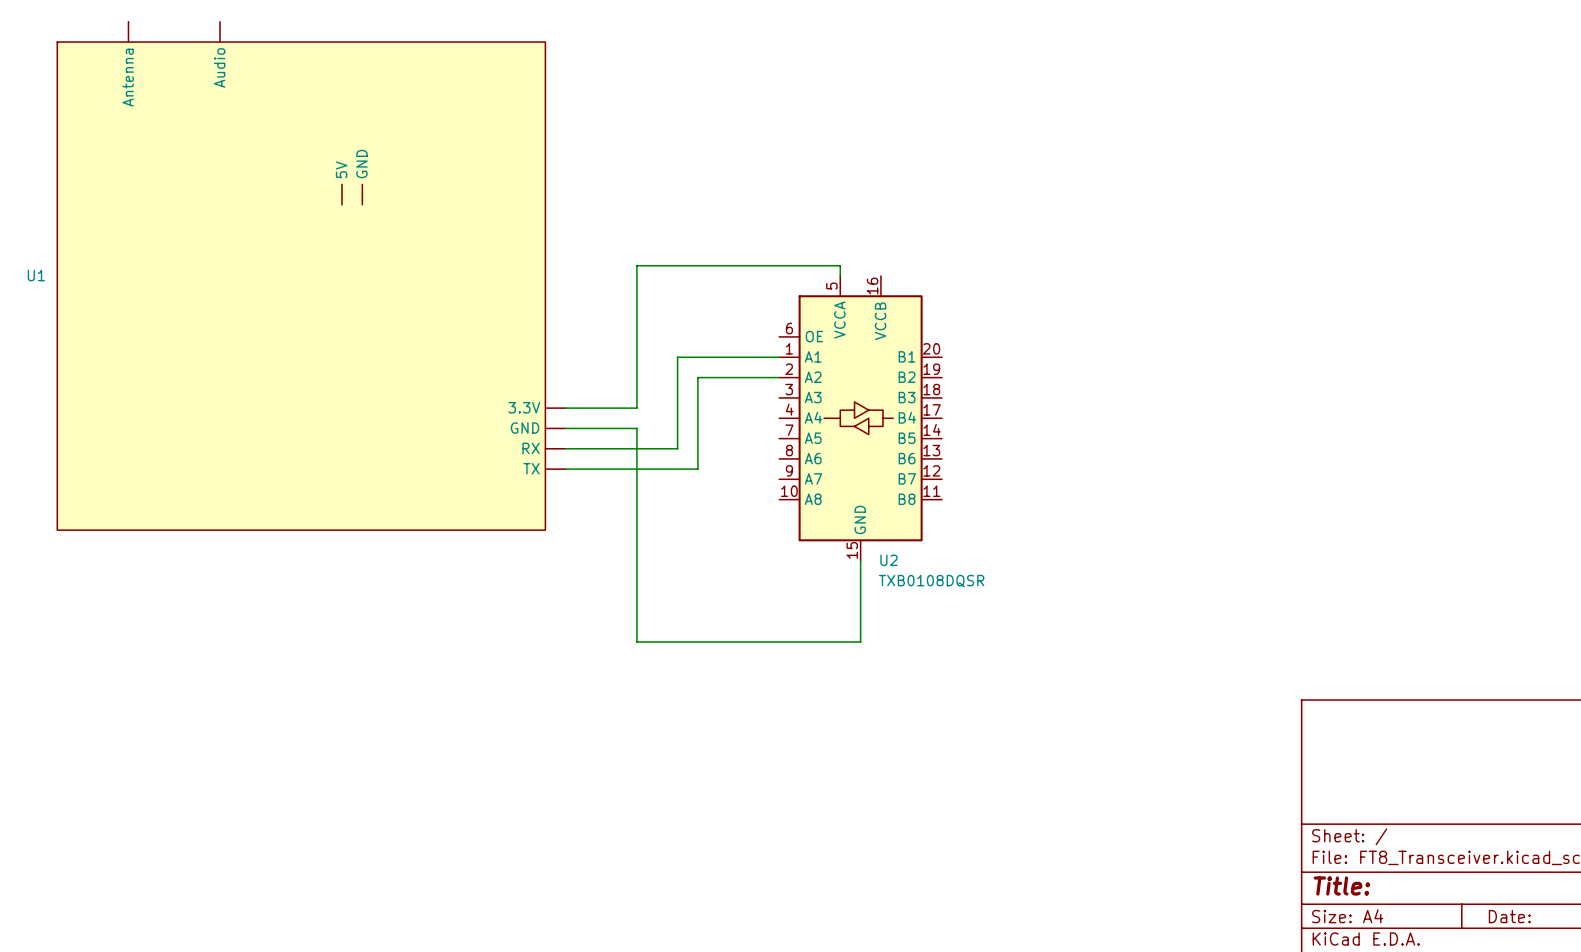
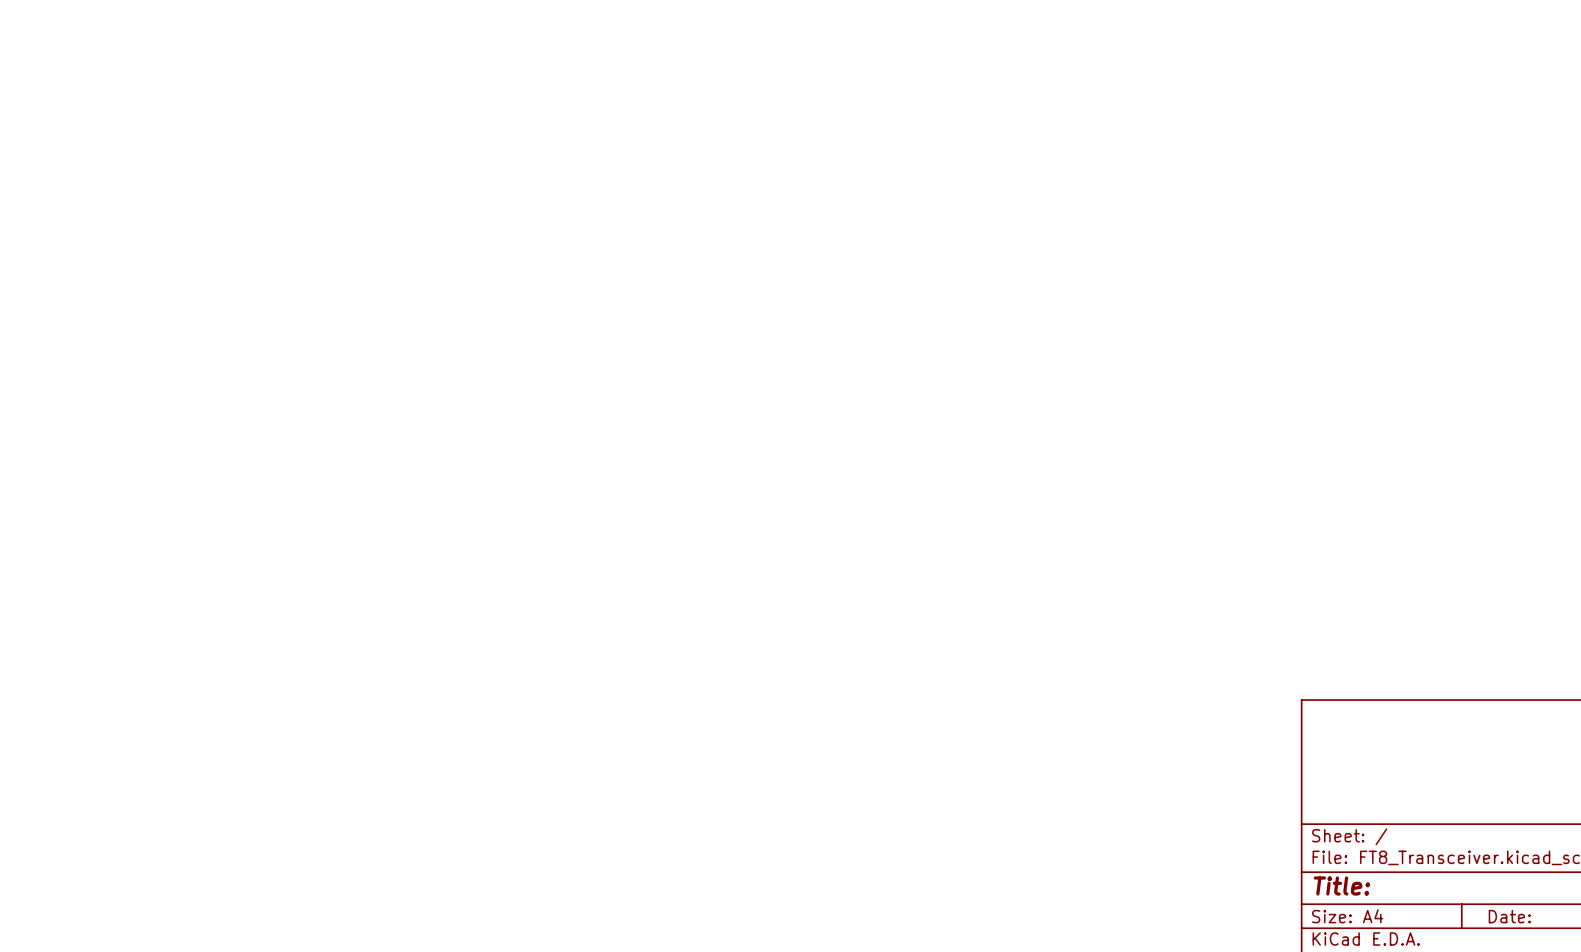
U1: (311, 275) -> none
wire: (840, 275) (840, 265) (636, 265) (636, 408) (565, 408) -> none
wire: (779, 357) (677, 357) (677, 448) (565, 448) -> none
wire: (779, 377) (697, 377) (697, 469) (565, 469) -> none
U2: TXB0108DQSR (860, 418) -> none
wire: (565, 428) (636, 428) (636, 641) (860, 641) (860, 560) -> none

